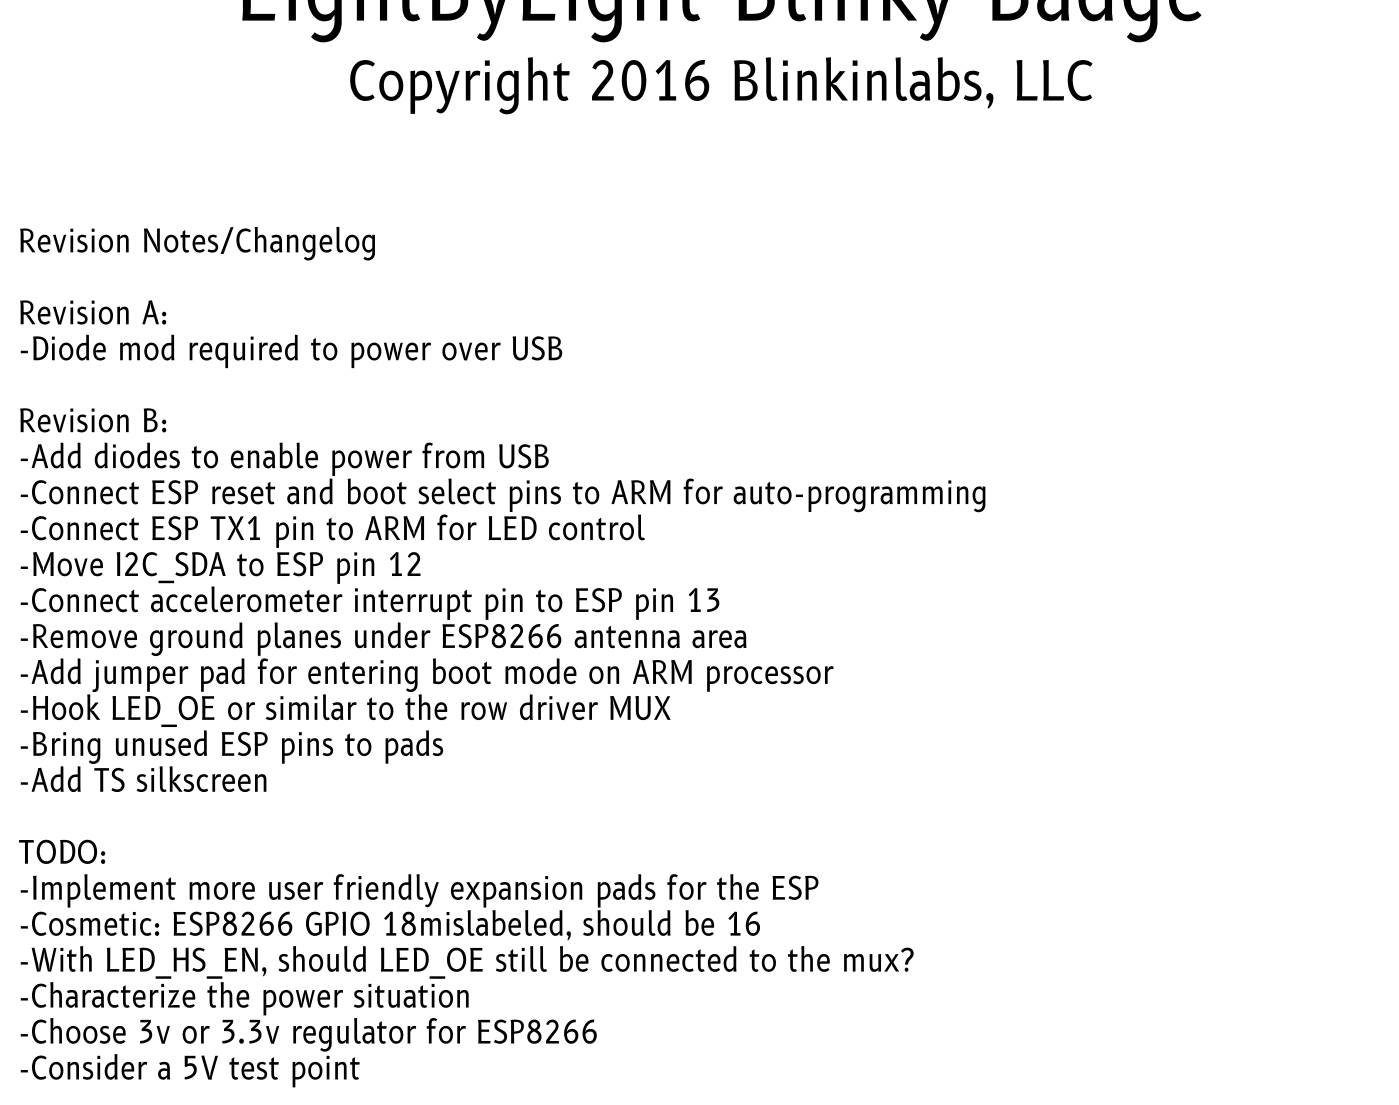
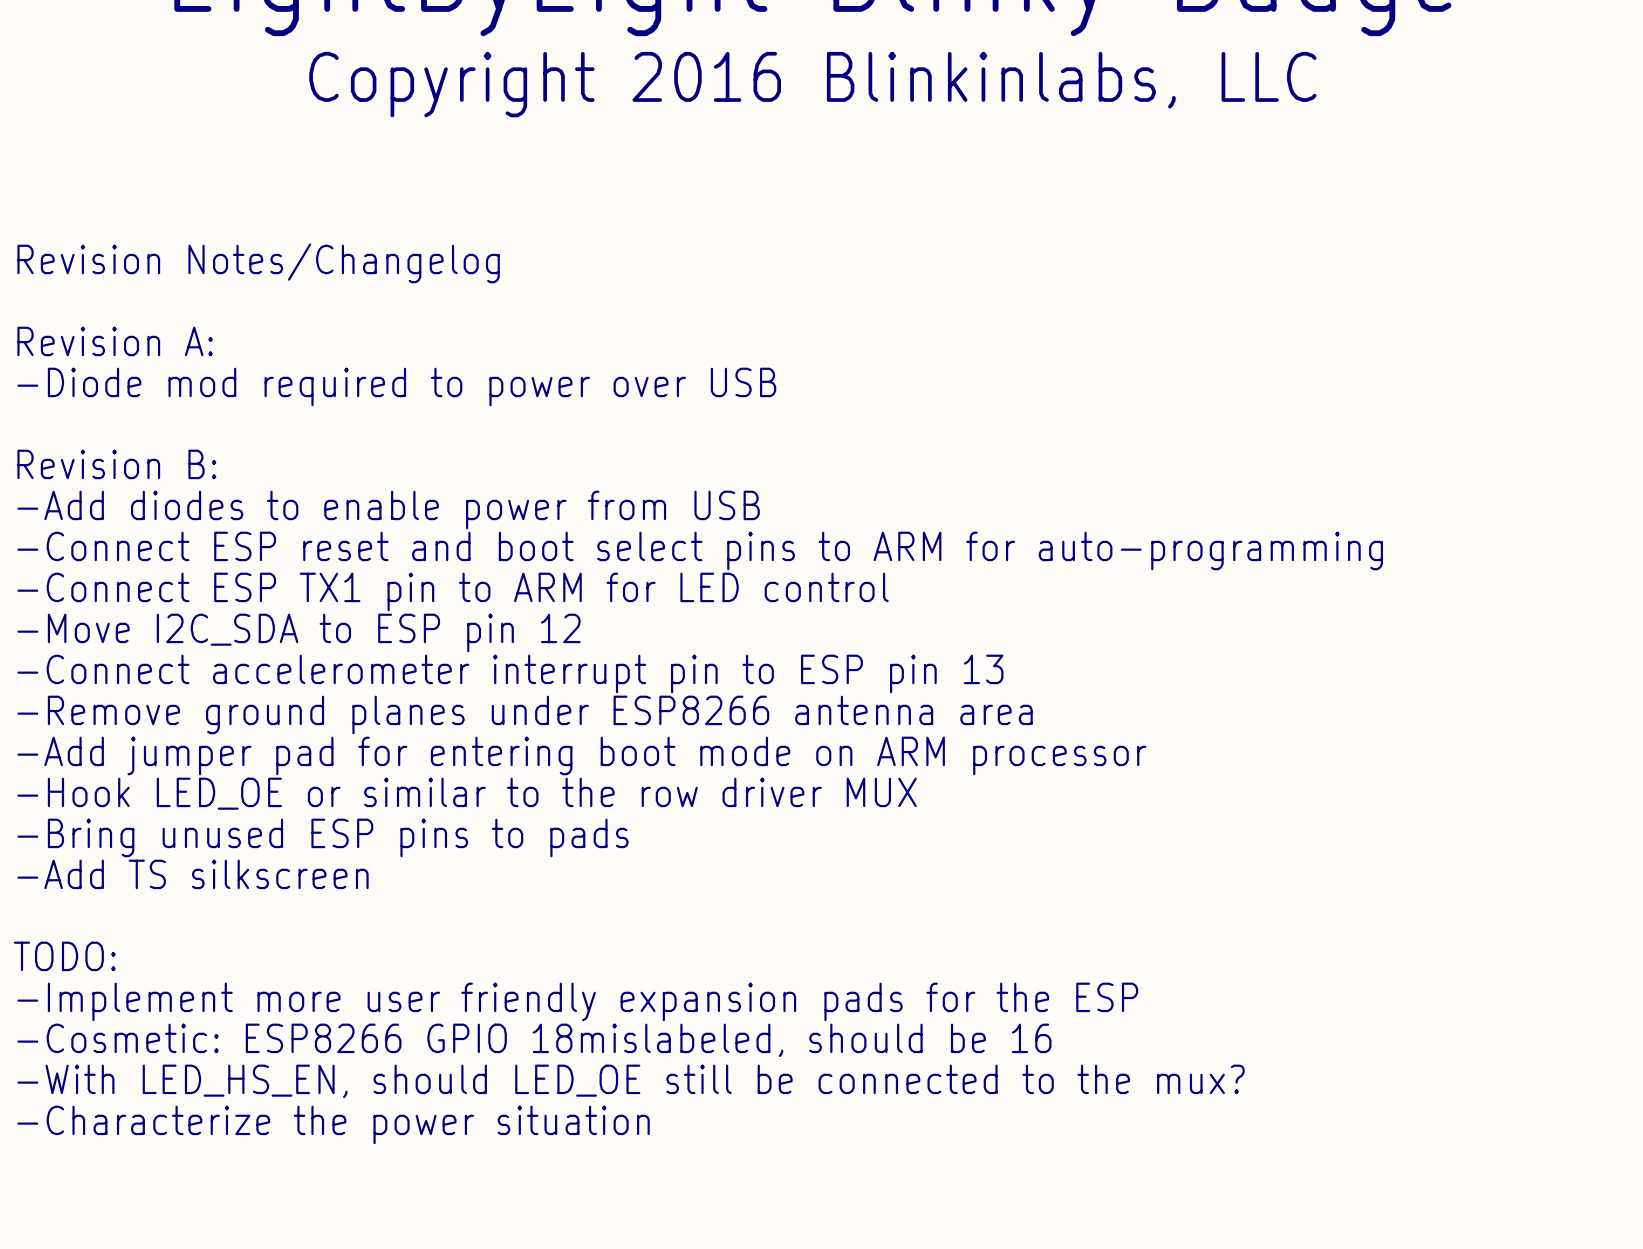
text: -Choose 3v or 3.3v regulator for ESP8266 (308, 1034) -> none
text: -Consider a 5V test point (190, 1070) -> none

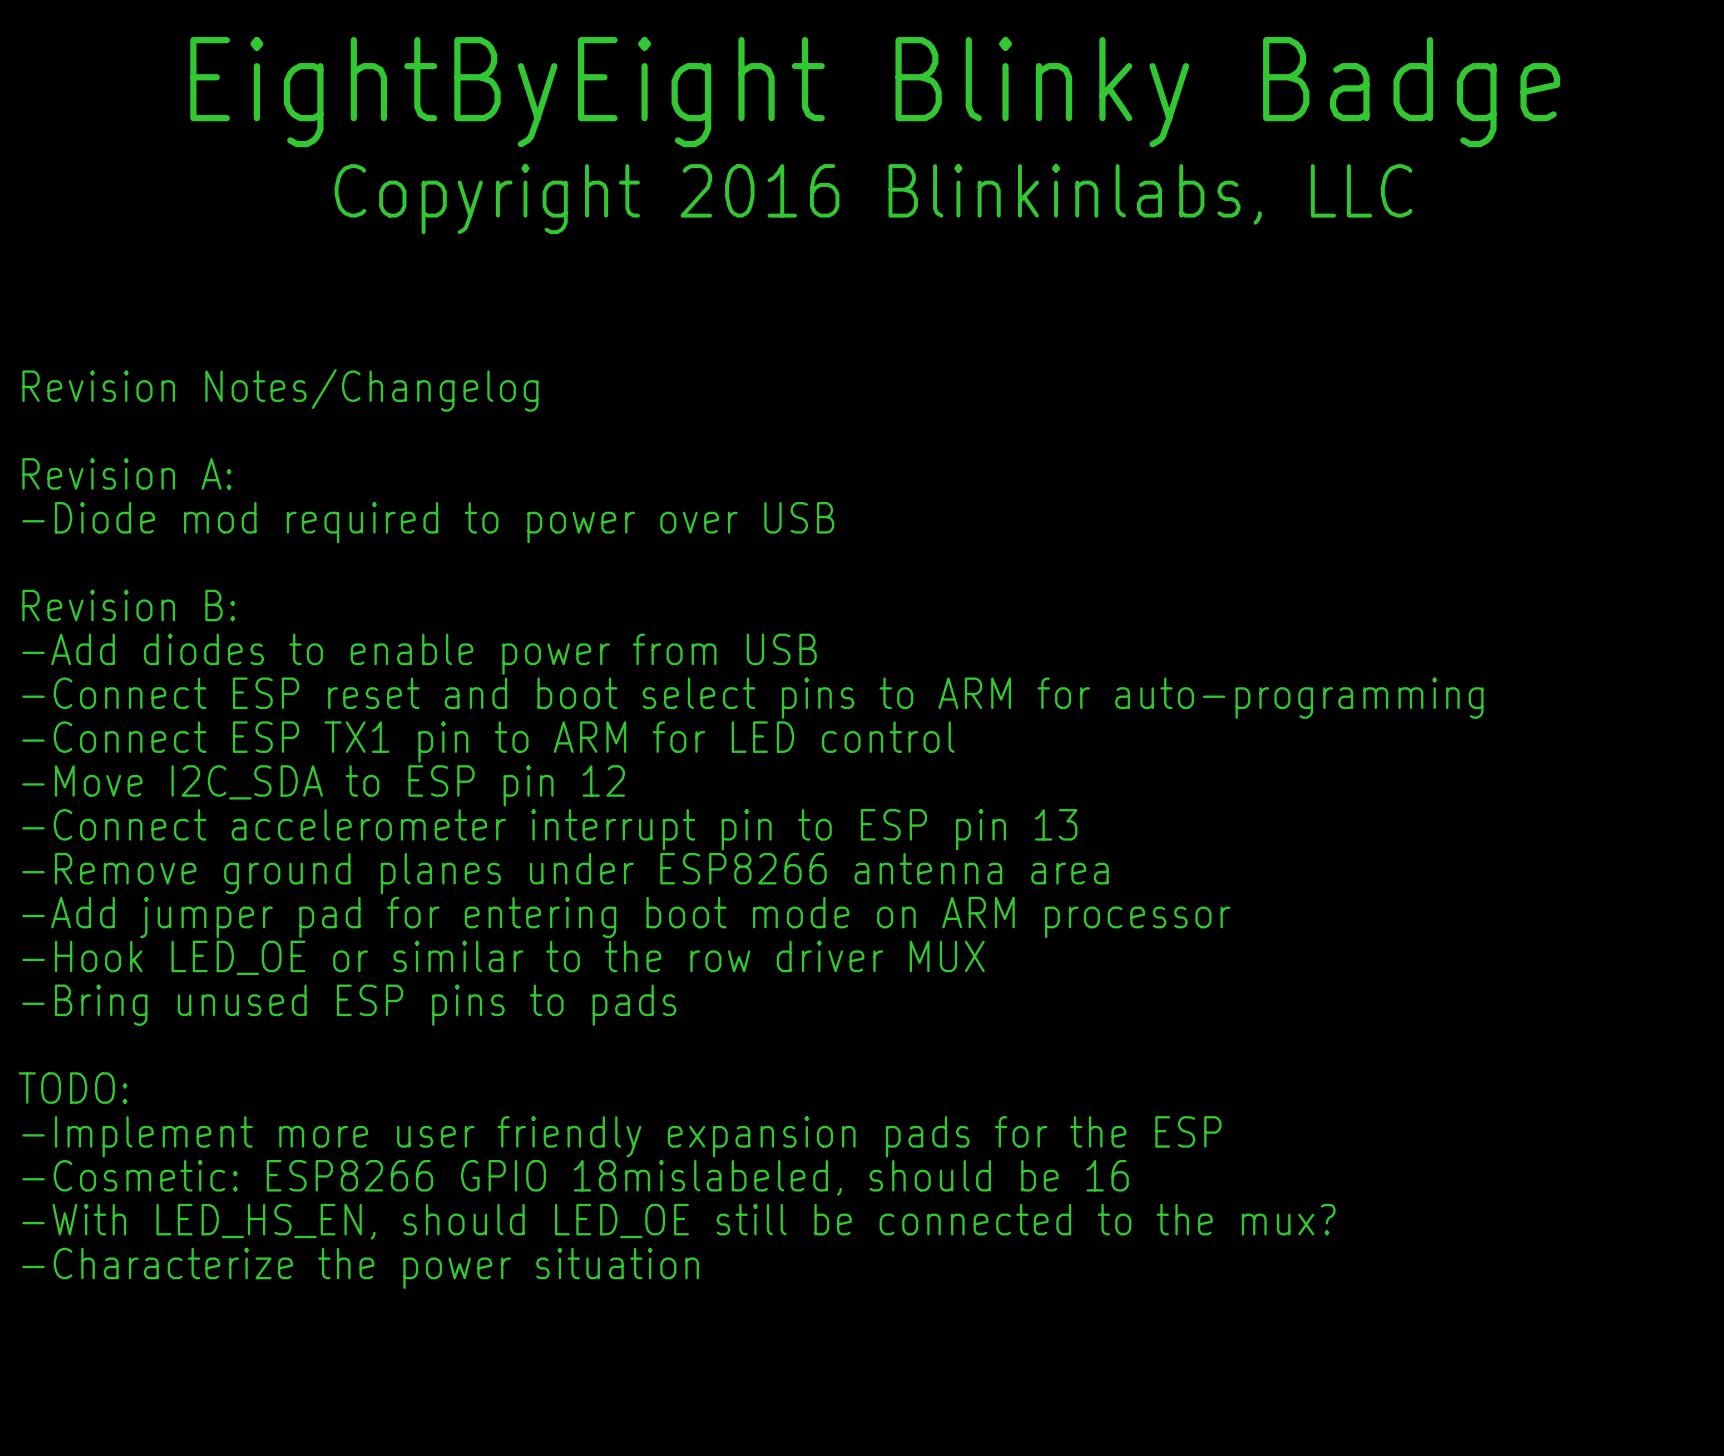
text: -Add TS silkscreen (193, 874) -> none
text: none -> TODO: (73, 1088)
text: TODO: (64, 956) -> -Implement more user friendly expansion pads for the ESP (621, 1136)
text: -Implement more user friendly expansion pads for the ESP (577, 1001) -> -Cosmetic: ESP8266 GPIO 18mislabeled, should be 16 (575, 1177)
text: -Cosmetic: ESP8266 GPIO 18mislabeled, should be 16 (534, 1040) -> -With LED_HS_EN, should LED_OE still be connected to the mux? (678, 1221)
text: -With LED_HS_EN, should LED_OE still be connected to the mux? (631, 1081) -> -Characterize the power situation (360, 1268)
text: -Characterize the power situation (333, 1124) -> none

